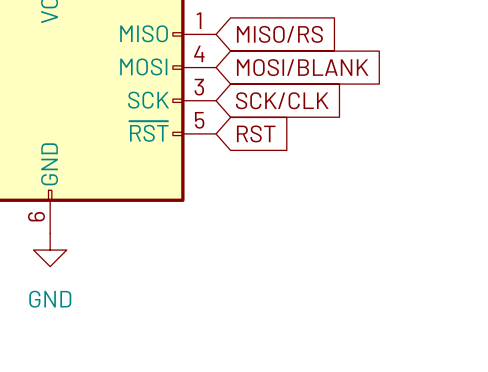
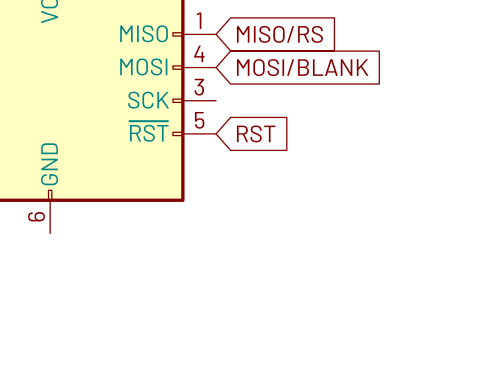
global label: SCK/CLK (282, 100) -> none
power symbol: GND (50, 250) -> none

